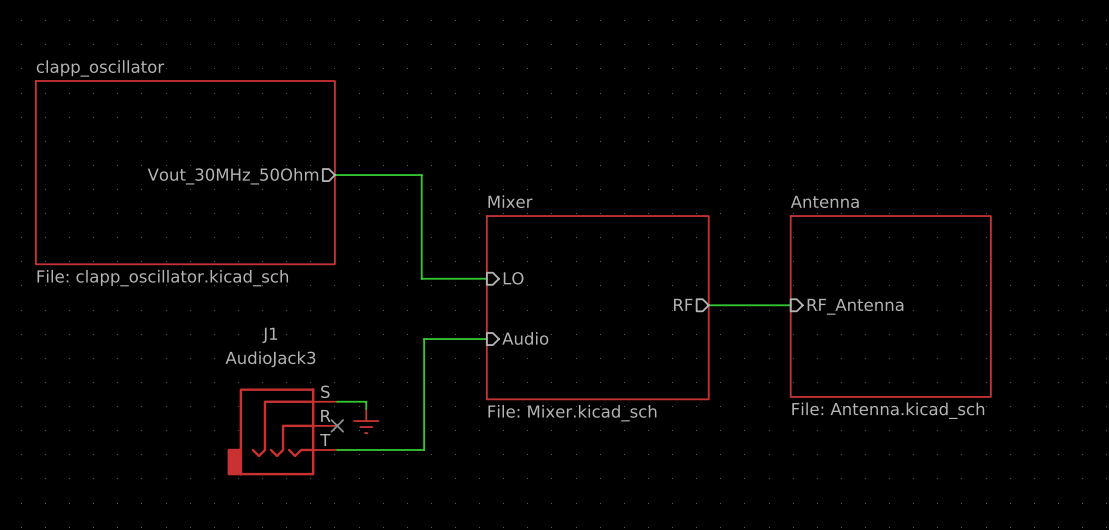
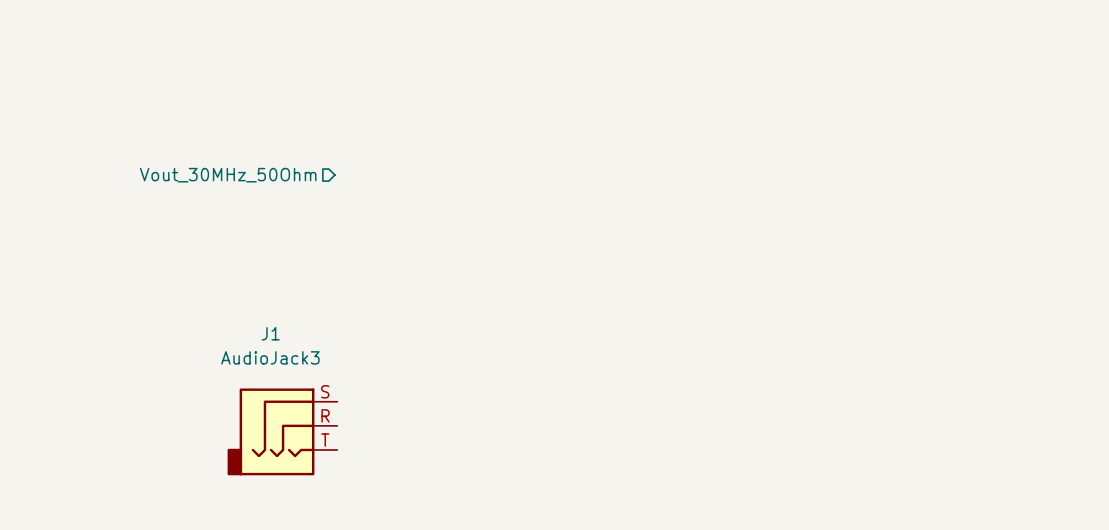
sheet clapp_oscillator: File: clapp_oscillator.kicad_sch (185, 172) -> none
wire: (334, 175) (421, 175) (421, 278) (486, 278) -> none
sheet pin: LO (513, 278) -> none
sheet pin: RF (683, 304) -> none
wire: (708, 305) (790, 305) -> none
sheet pin: RF_Antenna (855, 306) -> none
sheet Antenna: File: Antenna.kicad_sch (890, 306) -> none
sheet Mixer: File: Mixer.kicad_sch (597, 307) -> none
sheet pin: Audio (525, 338) -> none
wire: (486, 339) (424, 339) (424, 449) (337, 449) -> none
wire: (337, 401) (366, 401) (366, 408) -> none
power symbol: (366, 421) -> none
no-connect mark: (337, 425) -> none

